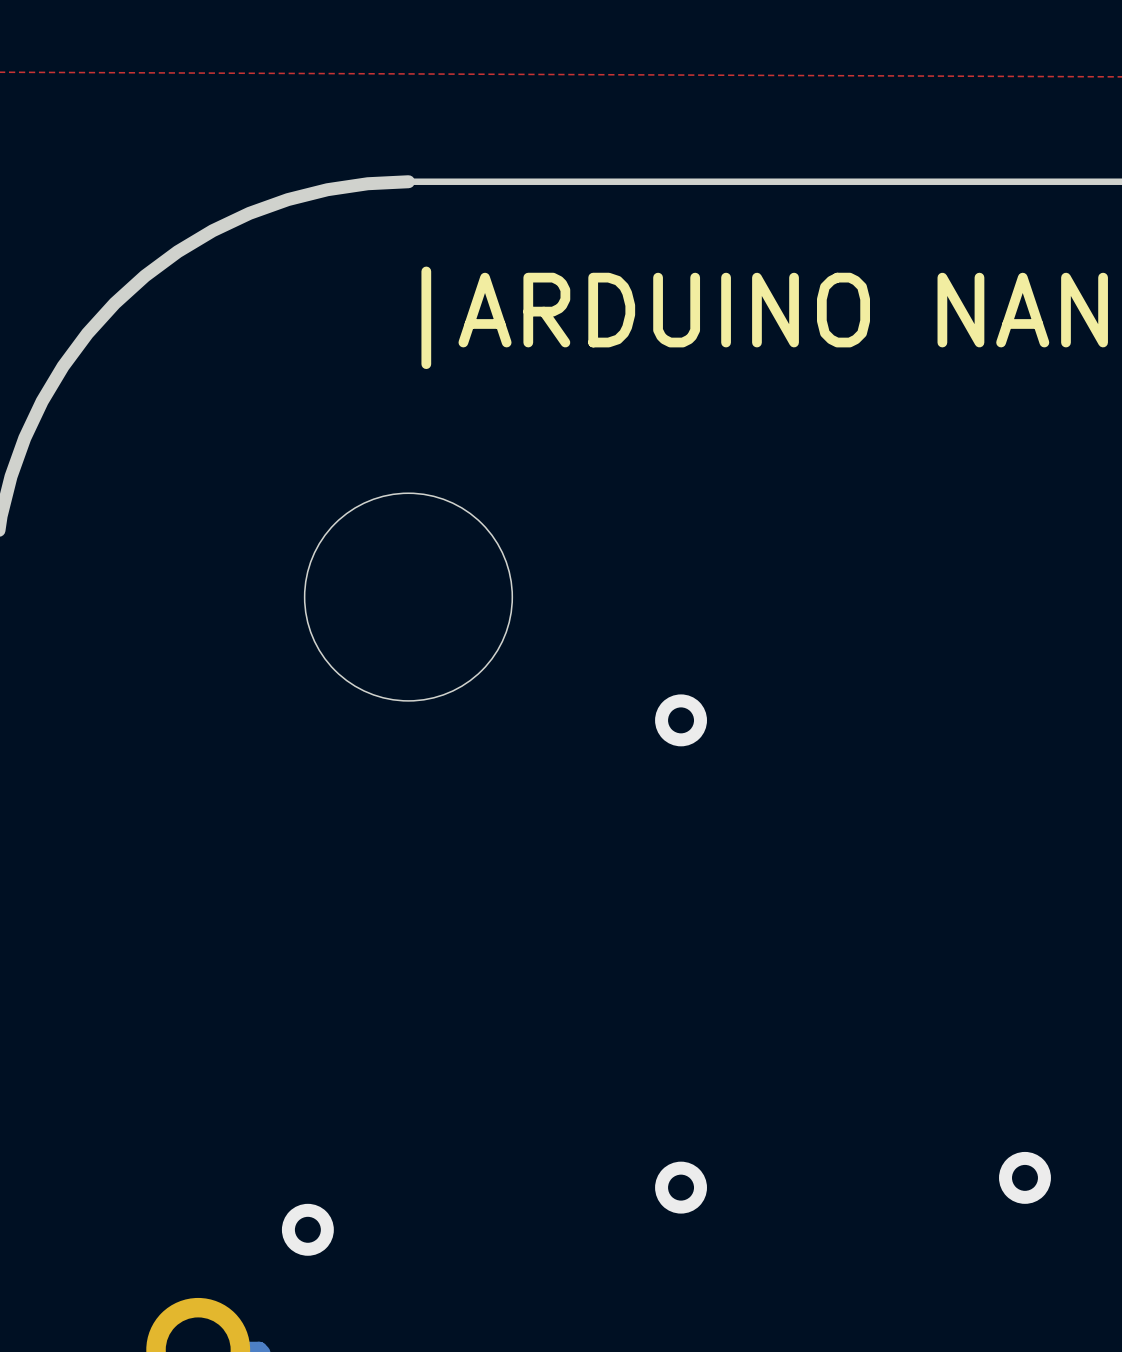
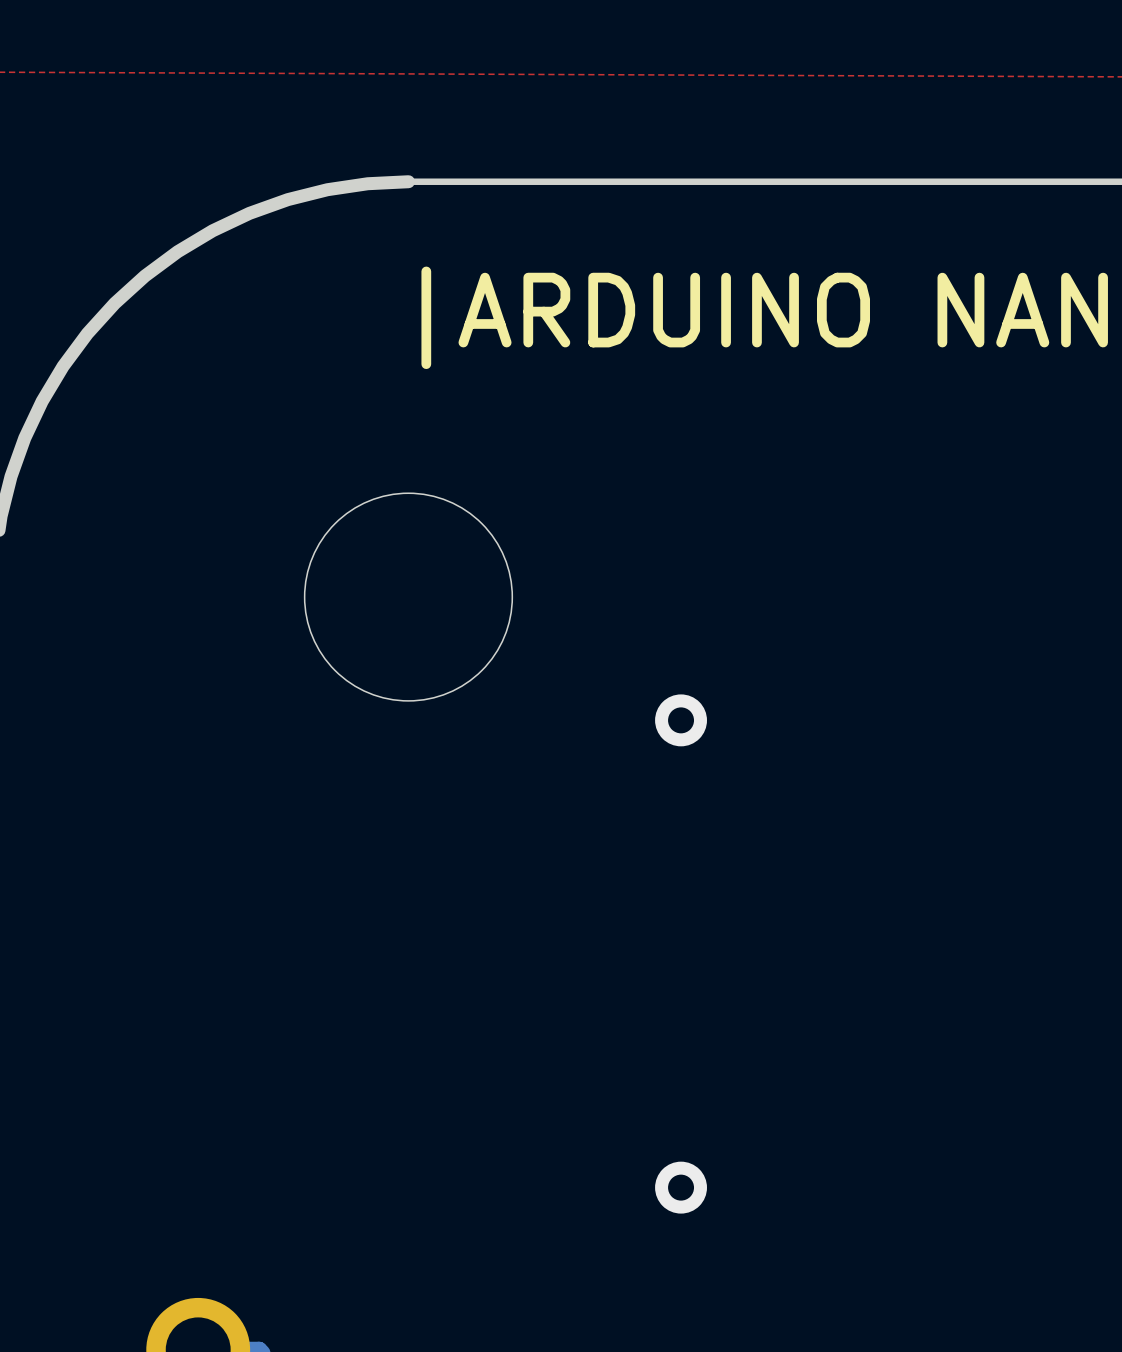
via: (1024, 1177) -> none
via: (307, 1229) -> none

